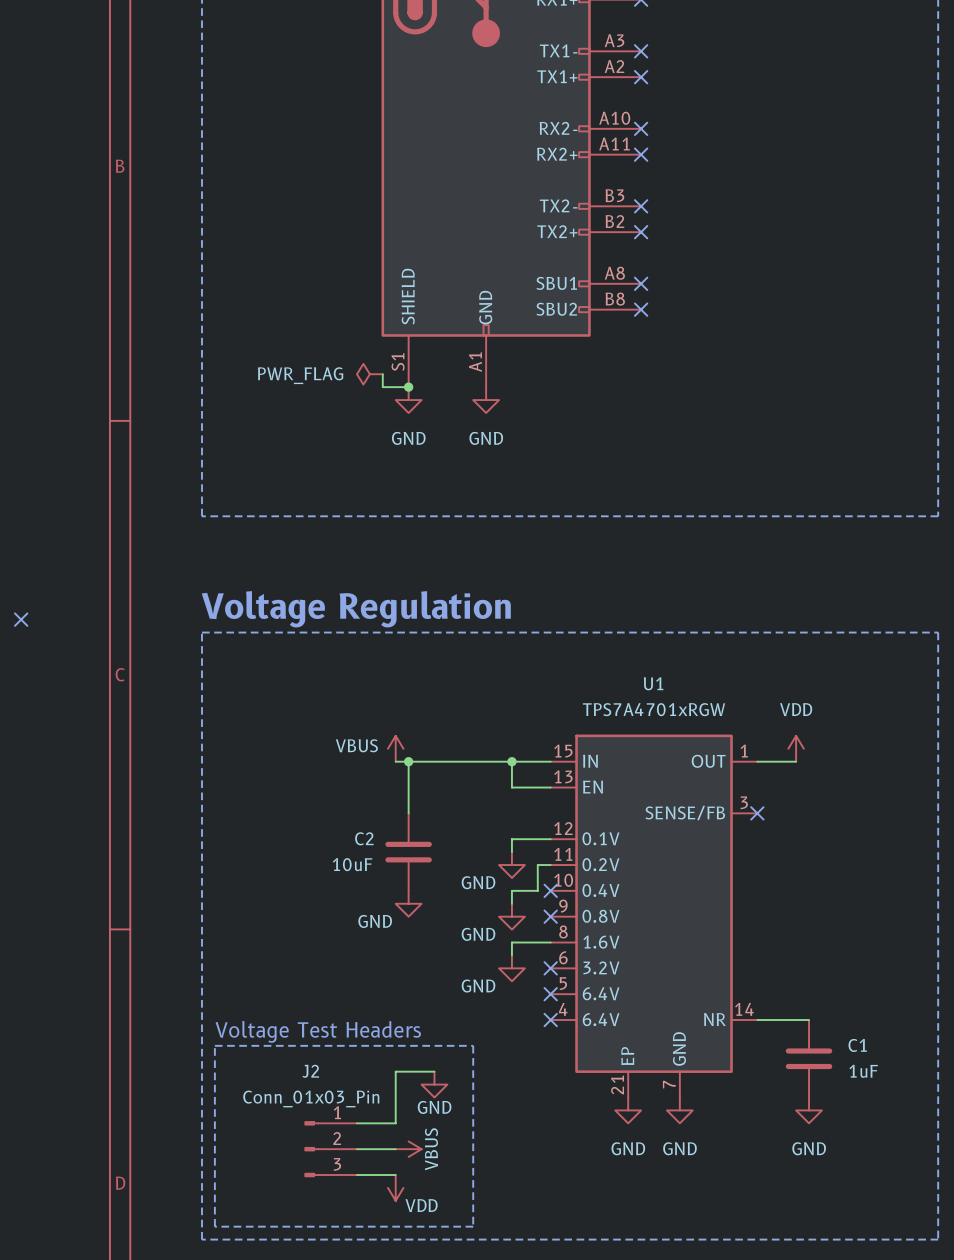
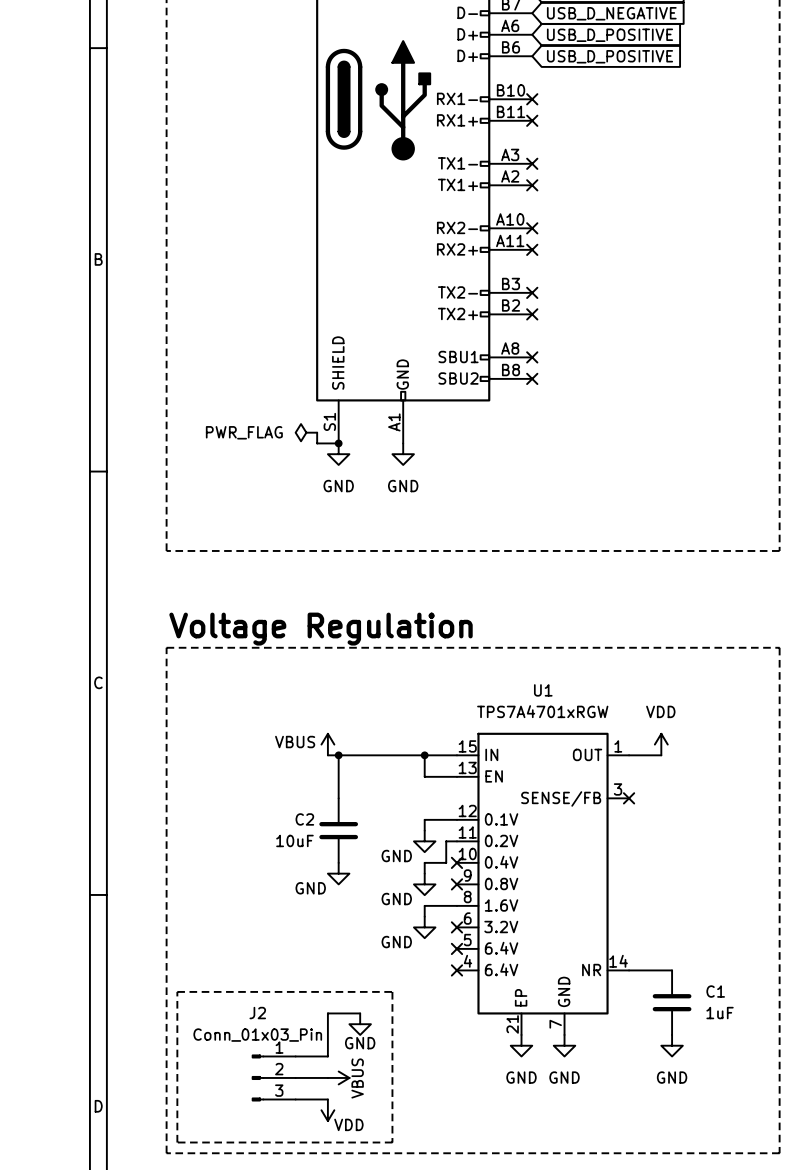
no-connect mark: (21, 619) -> none
text: Voltage Test Headers (318, 1031) -> none

